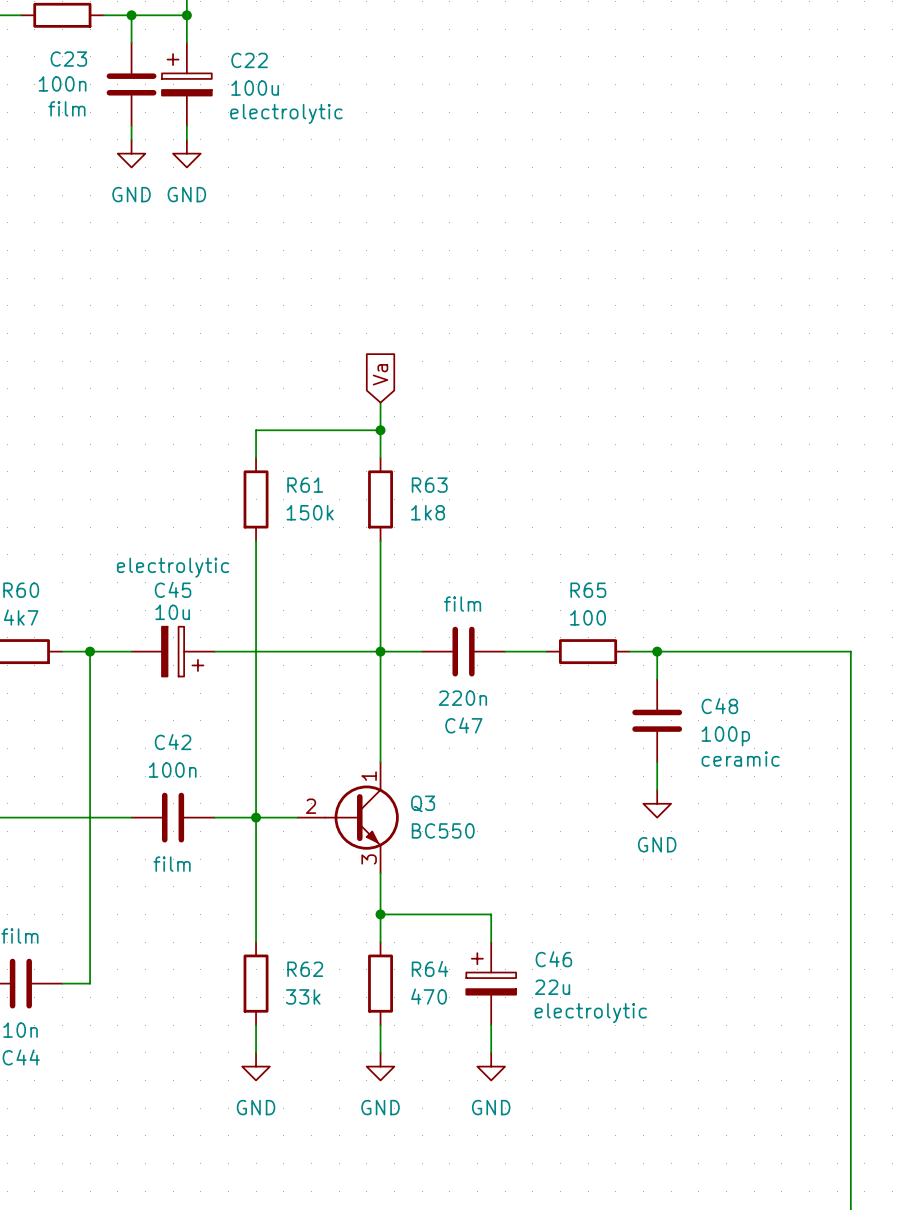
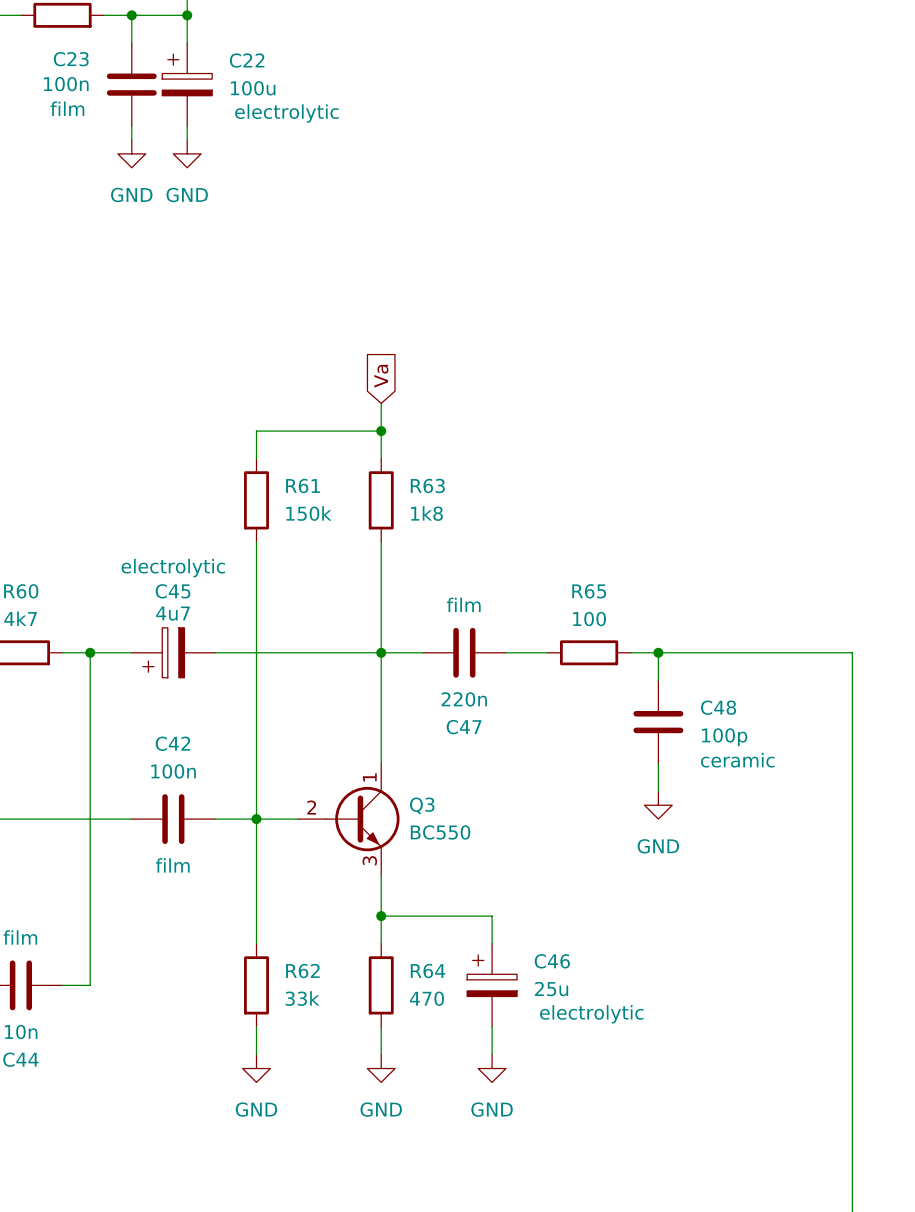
C45 value: 10u (172, 612) -> 4u7 (173, 613)
C45 flip: as is (182, 651) -> left-right (163, 652)
C46 value: 22u (552, 987) -> 25u (551, 989)

